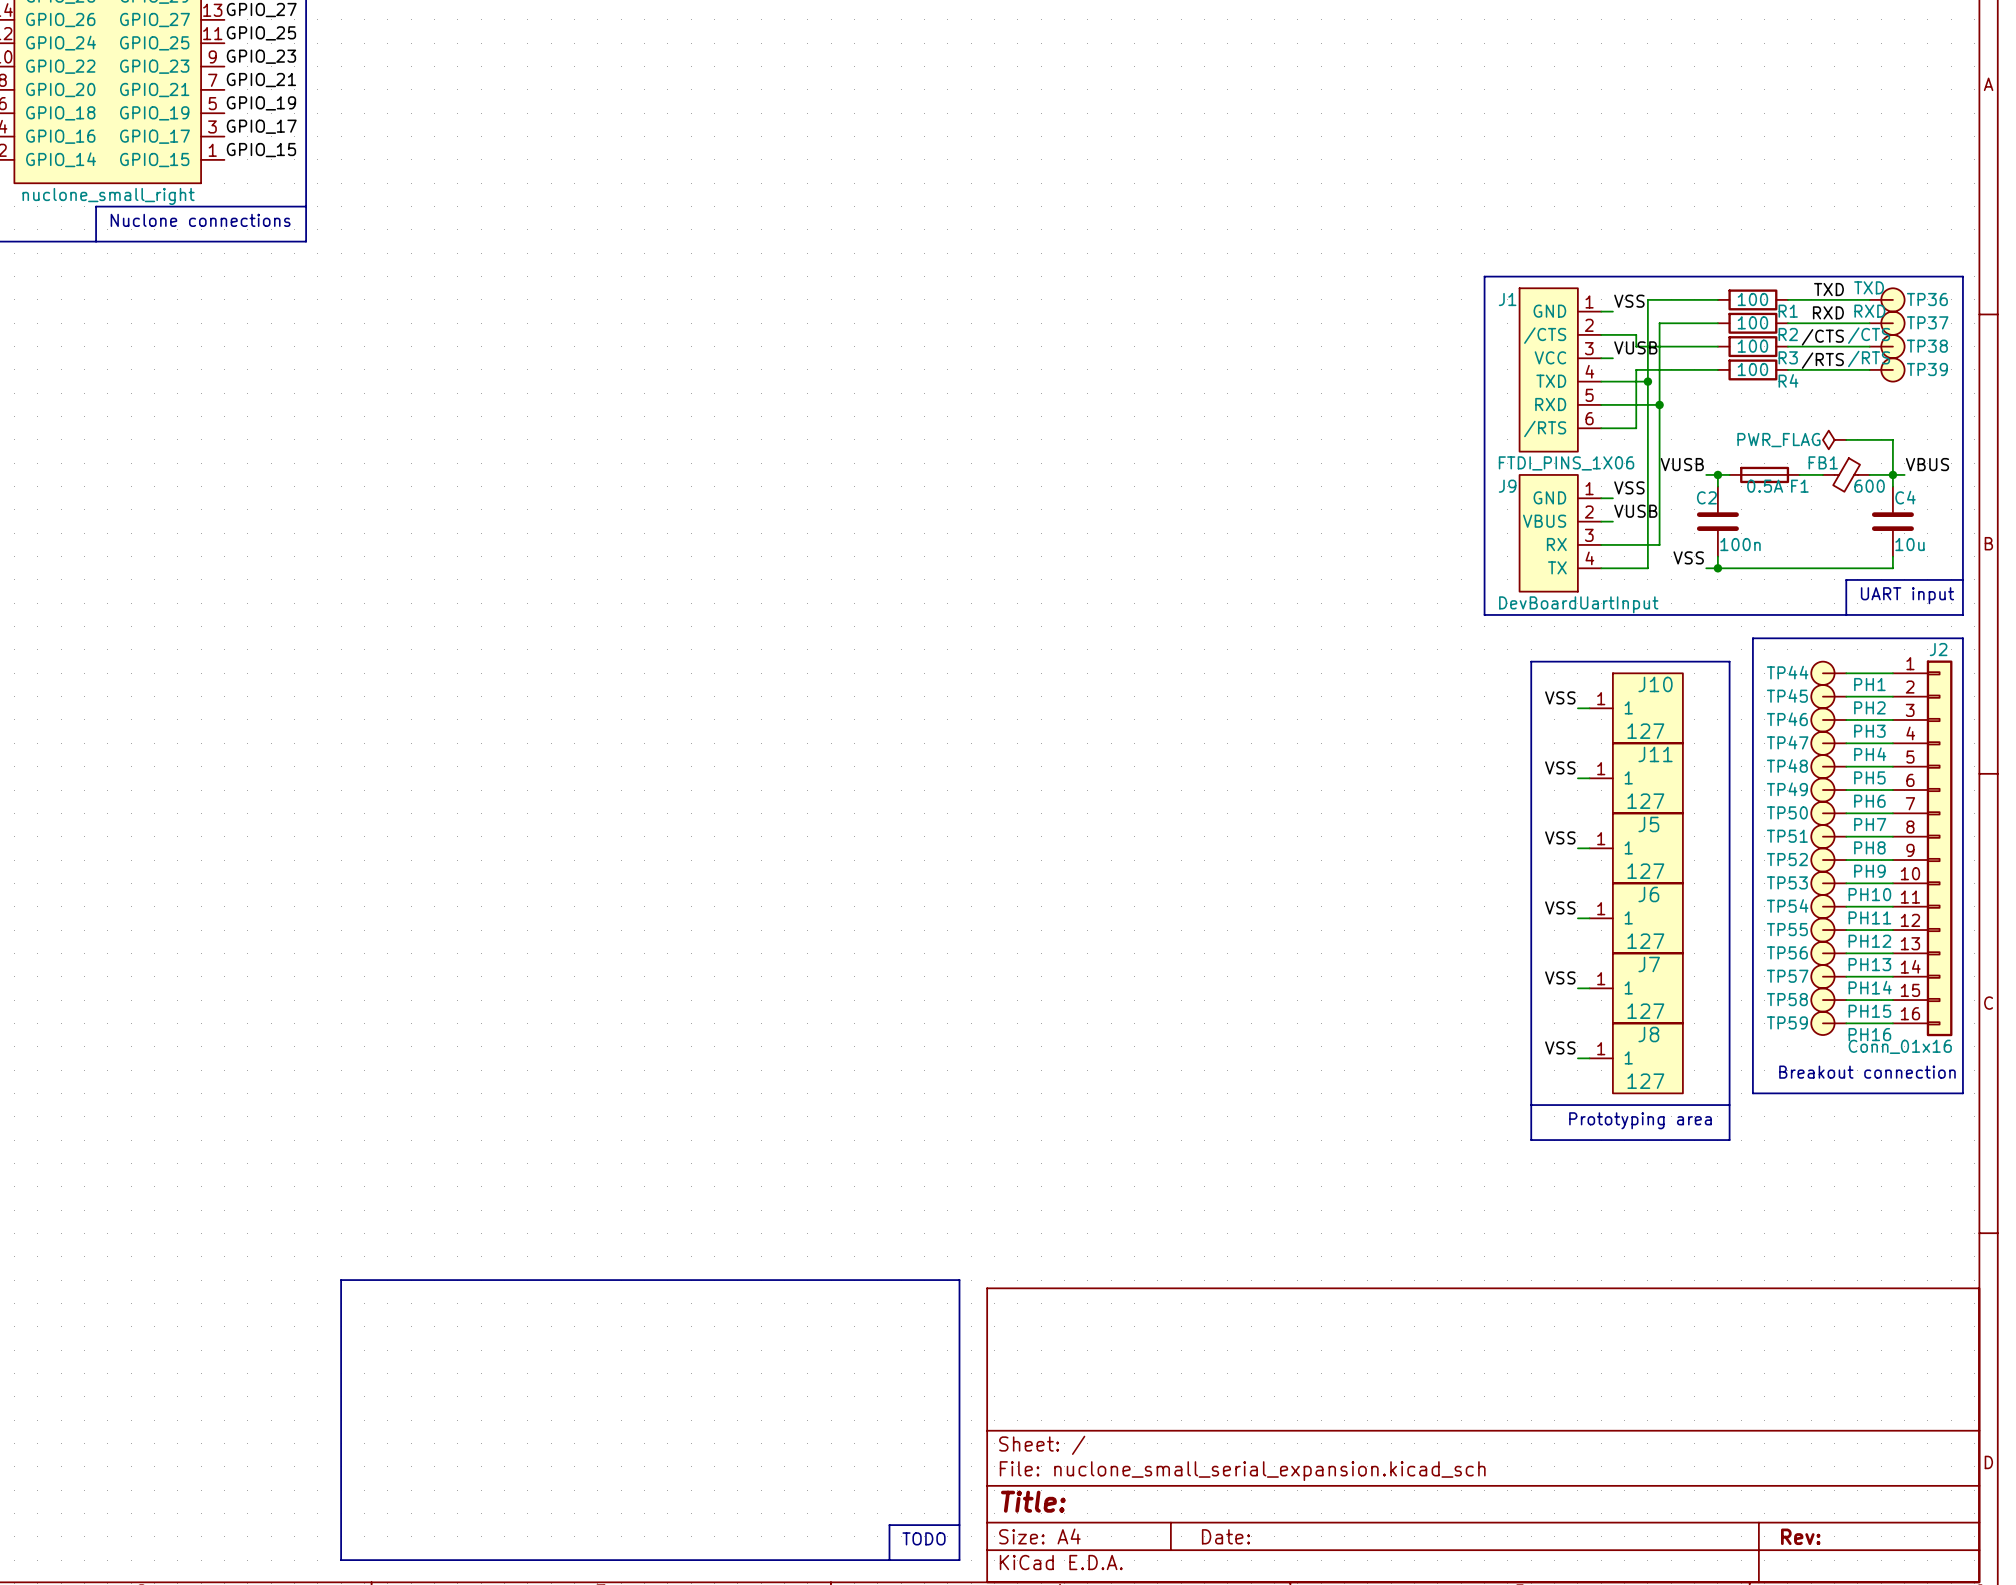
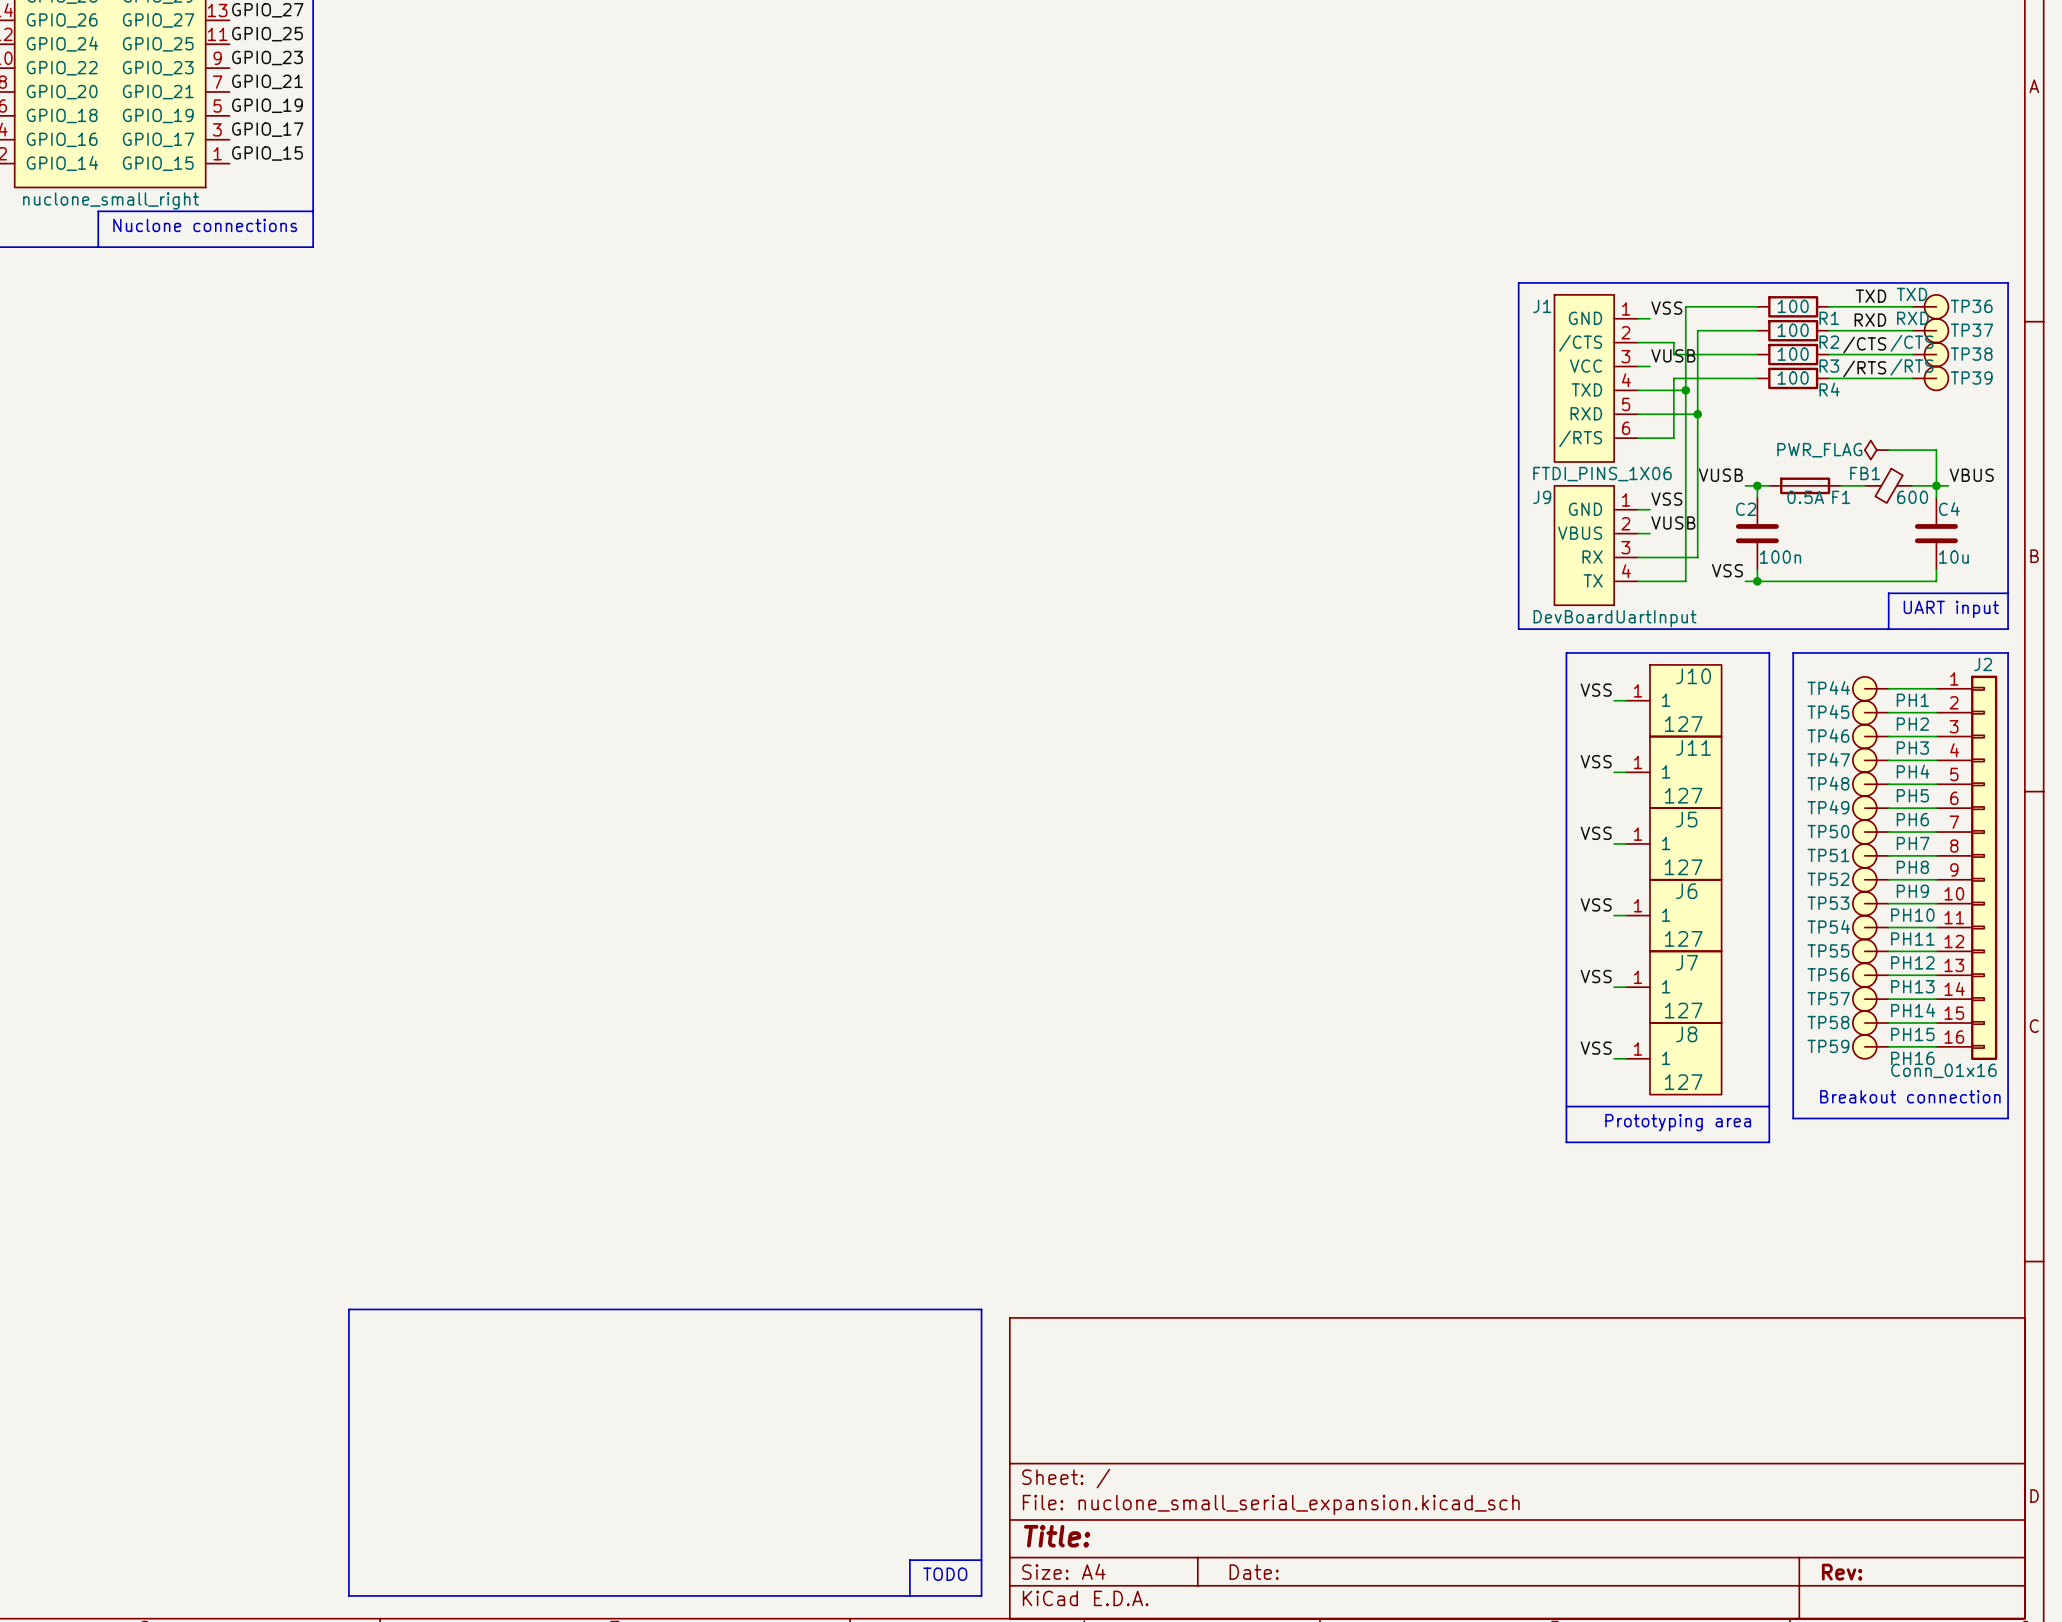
line: (1531, 661) (1729, 661) -> (1566, 676) (1566, 652) (1769, 652) (1769, 676)
label position: VSS (1560, 697) -> VSS (1596, 690)
wire: (1577, 708) (1589, 708) -> (1614, 700) (1626, 700)
J10 position: (1636, 708) -> (1673, 700)
label position: VSS (1560, 767) -> VSS (1596, 761)
wire: (1577, 778) (1589, 778) -> (1614, 772) (1626, 772)
J11 position: (1636, 778) -> (1673, 772)
label position: VSS (1560, 837) -> VSS (1596, 833)
wire: (1577, 848) (1589, 848) -> (1614, 843) (1626, 843)
J5 position: (1636, 848) -> (1673, 843)
label position: VSS (1560, 907) -> VSS (1596, 904)
wire: (1577, 918) (1589, 918) -> (1614, 915) (1626, 915)
J6 position: (1636, 918) -> (1673, 915)
label position: VSS (1560, 977) -> VSS (1596, 976)
wire: (1577, 988) (1589, 988) -> (1614, 987) (1626, 987)
J7 position: (1636, 988) -> (1673, 987)
label position: VSS (1560, 1047) -> VSS (1596, 1048)
wire: (1577, 1058) (1589, 1058) -> (1614, 1058) (1626, 1058)
J8 position: (1636, 1058) -> (1673, 1058)
line: (1531, 1105) (1729, 1105) -> (1566, 1106) (1769, 1106)
line: (1531, 1116) (1531, 1140) (1729, 1140) (1729, 1116) -> (1566, 1142) (1769, 1142)
text position: Prototyping area (1640, 1120) -> Prototyping area (1678, 1122)

